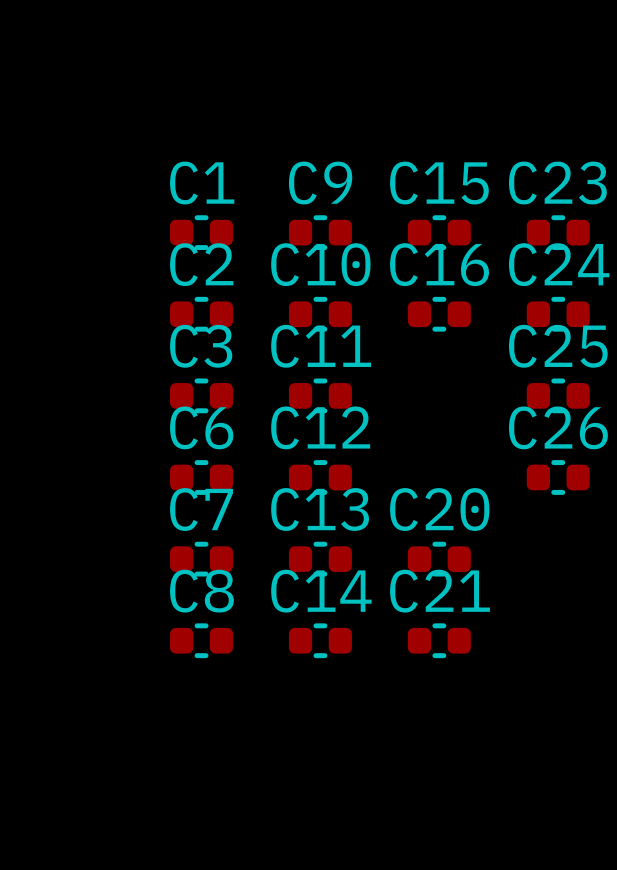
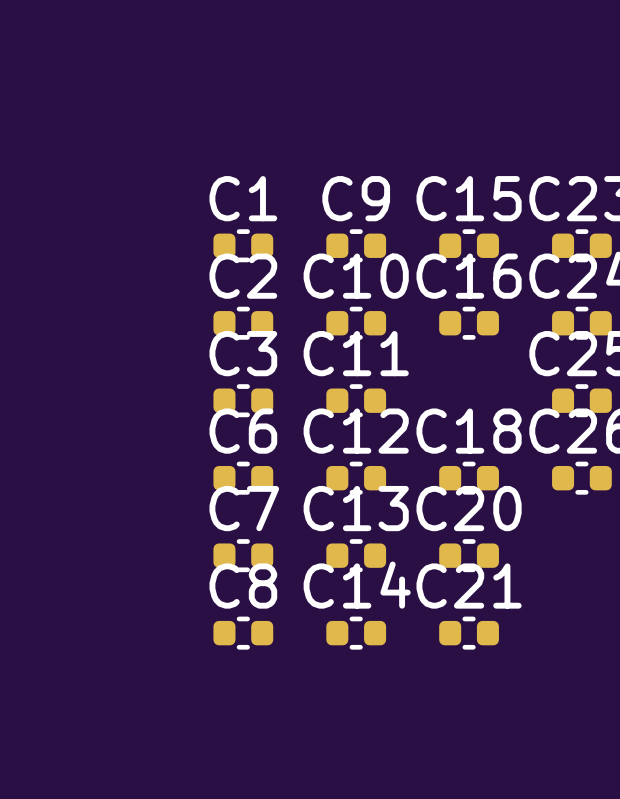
C18: none -> (469, 478)

